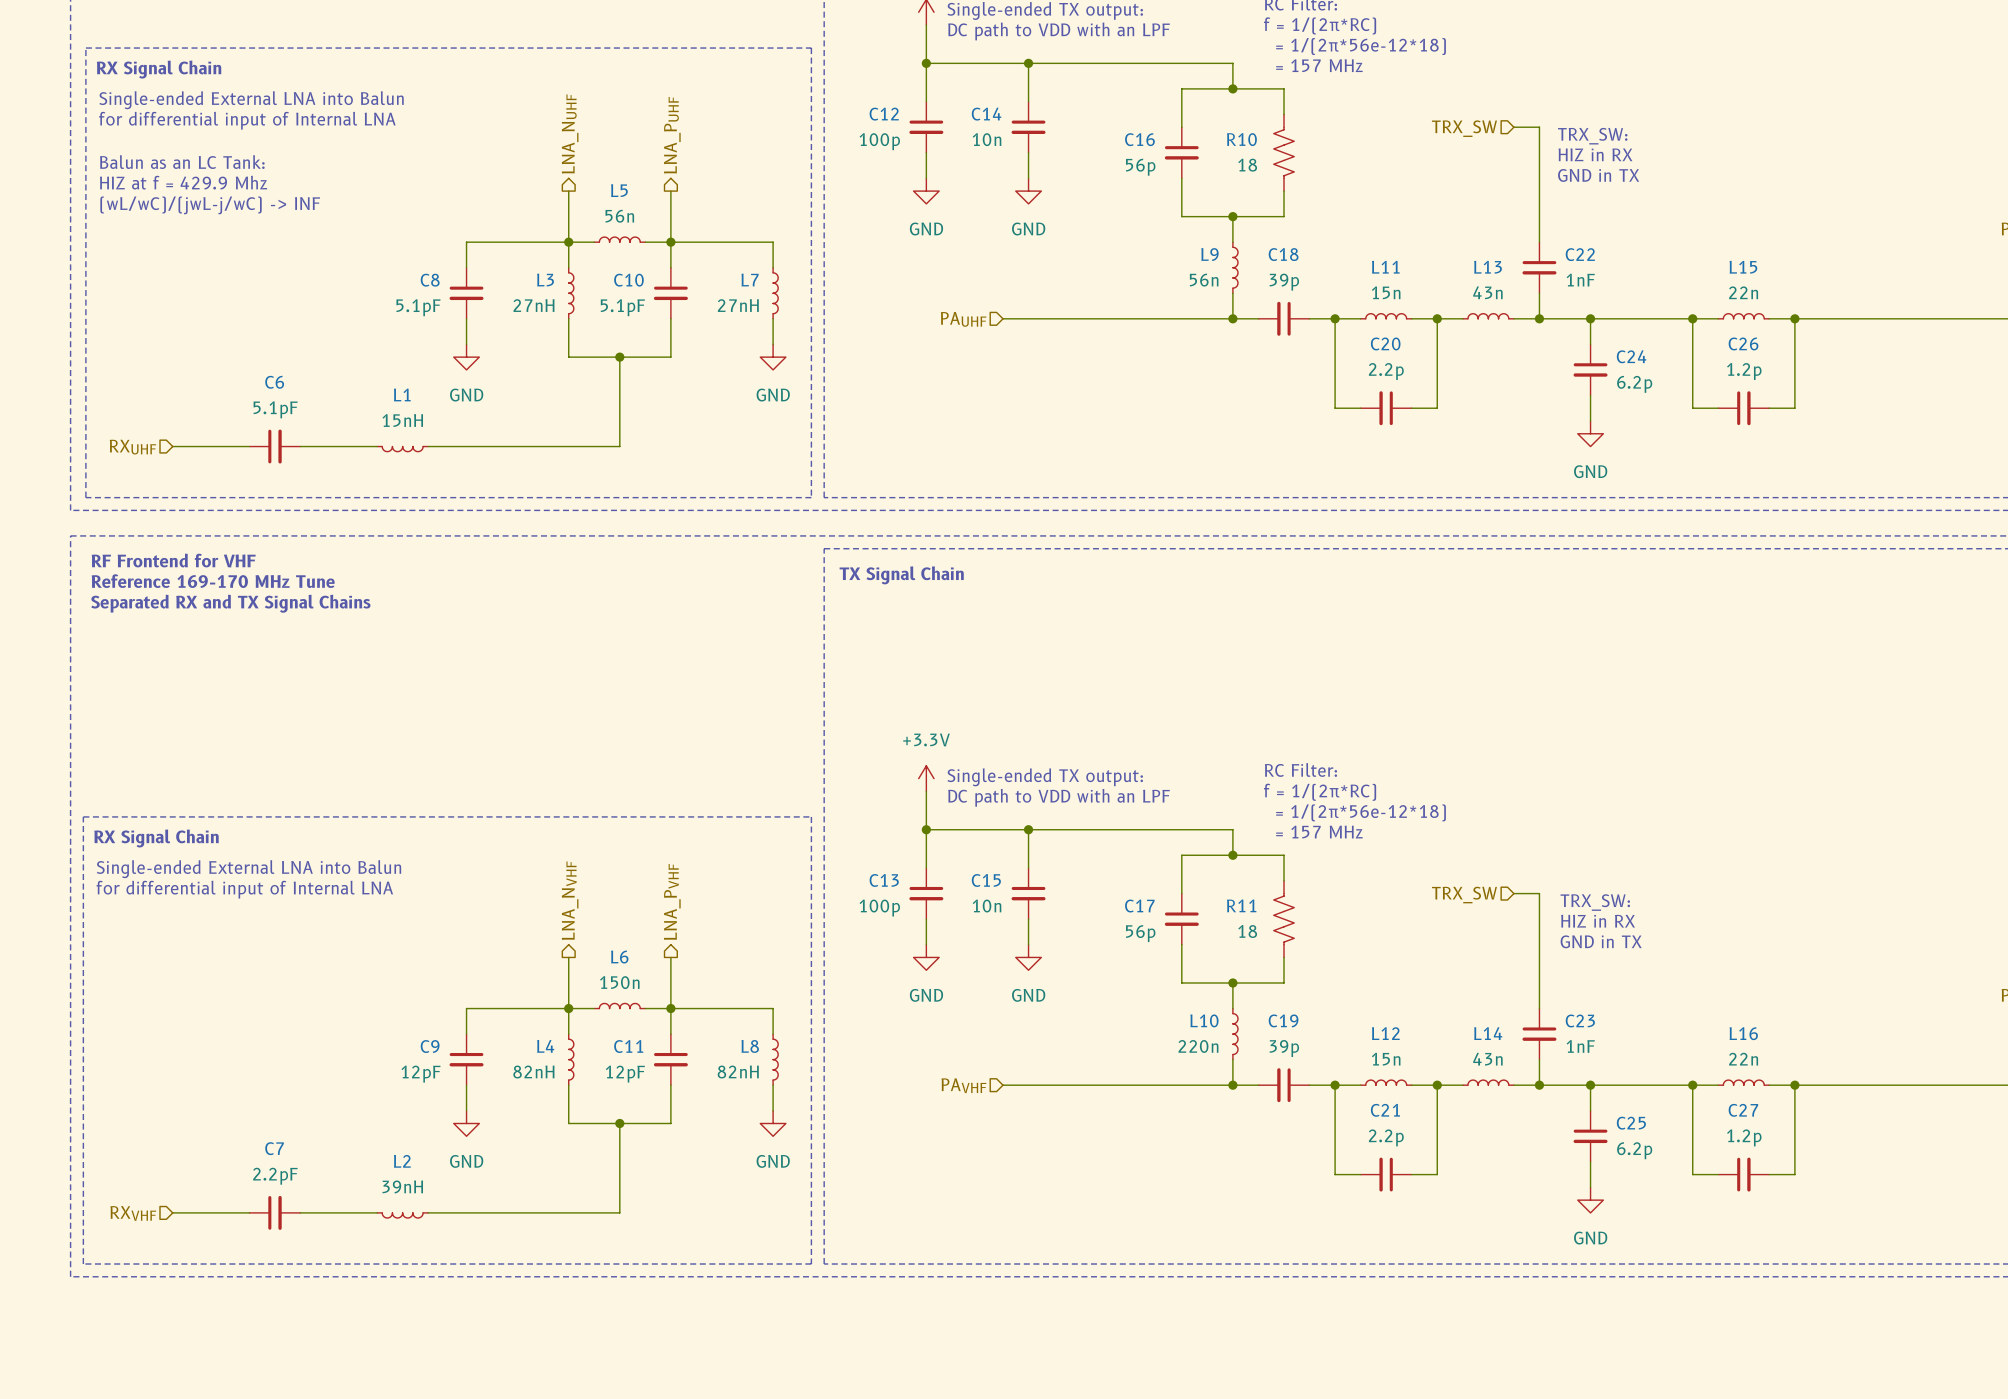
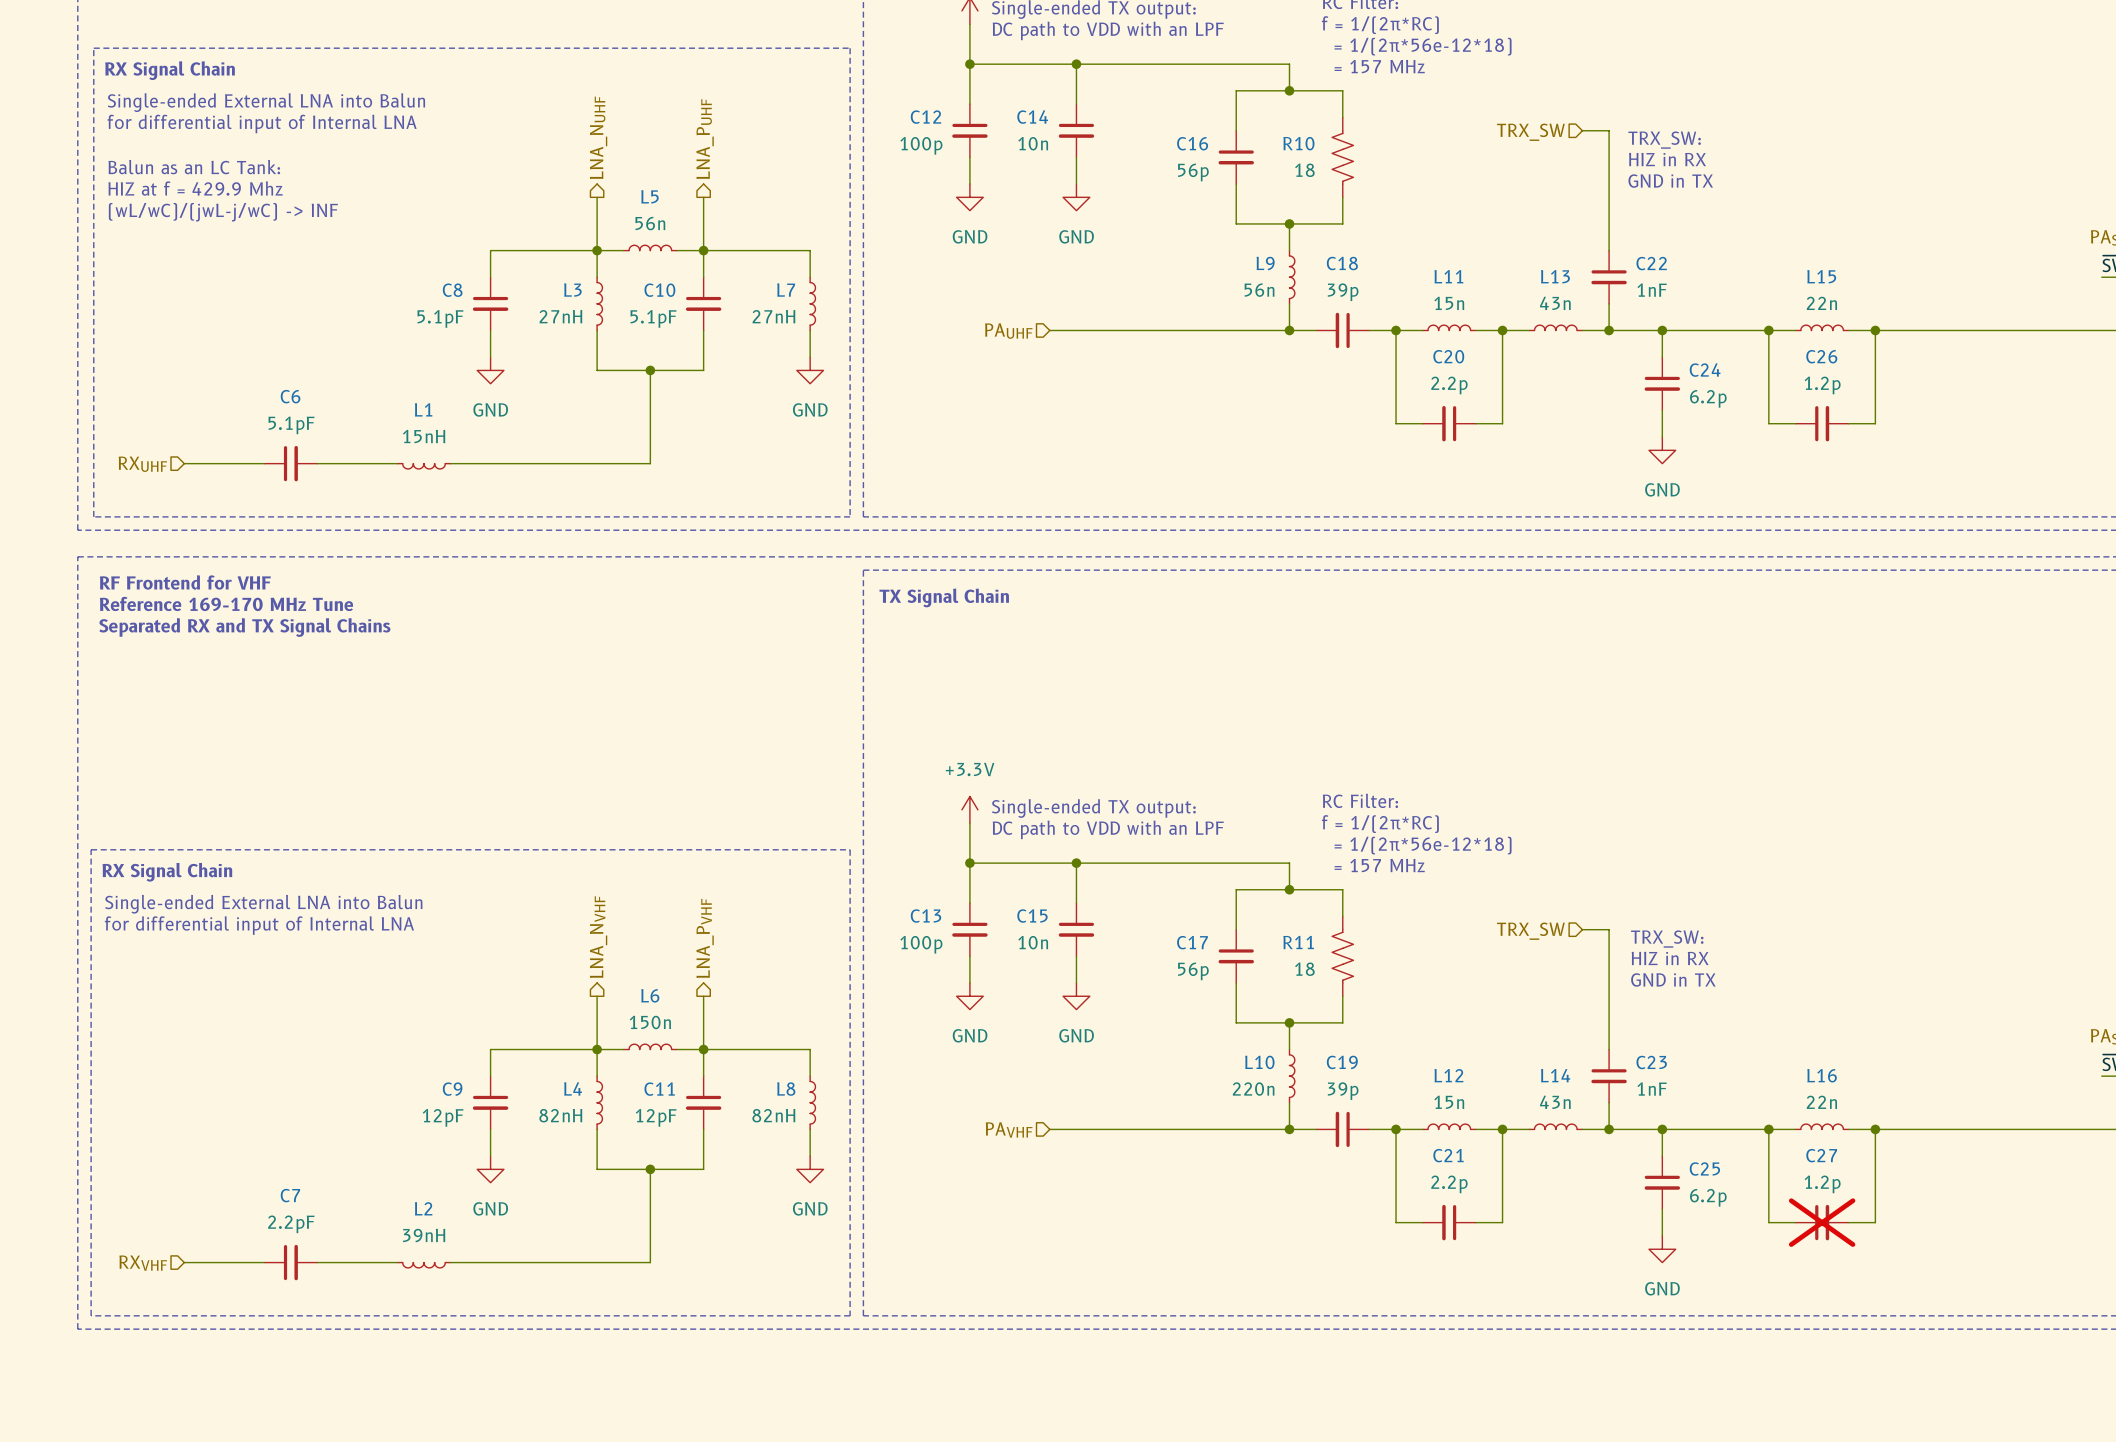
C27 do-not-place cross: none -> (1822, 1222)

